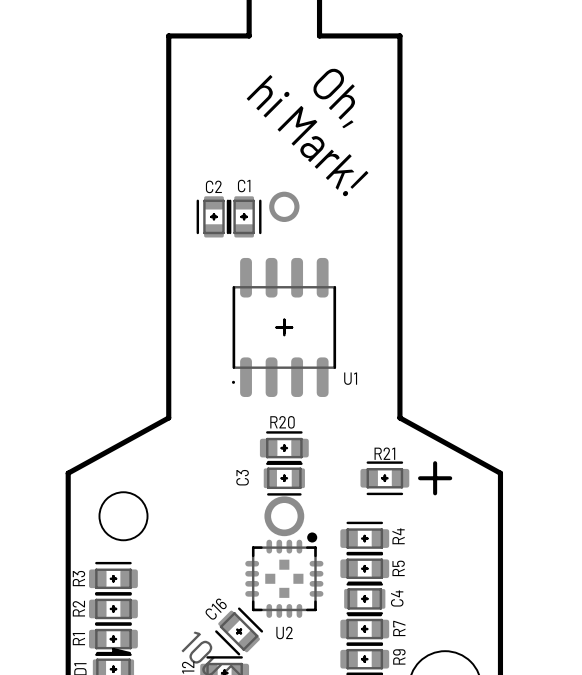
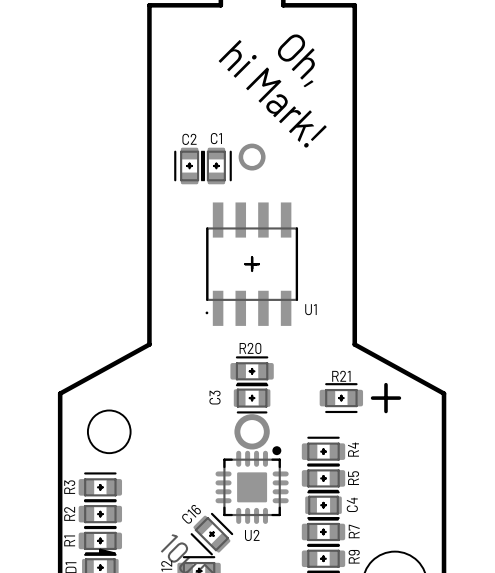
U1 footprint: [231, 257, 337, 397] -> [205, 202, 299, 326]
U2 footprint: [245, 532, 324, 618] -> [215, 446, 289, 524]

